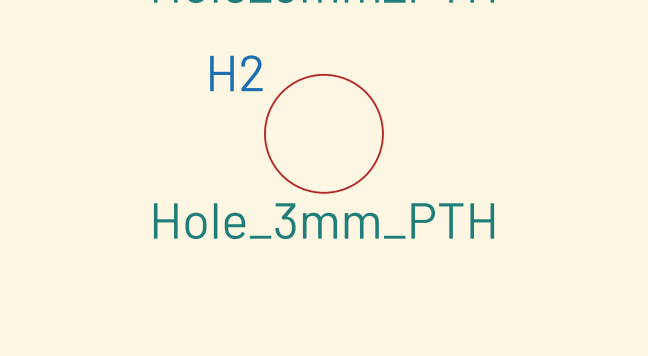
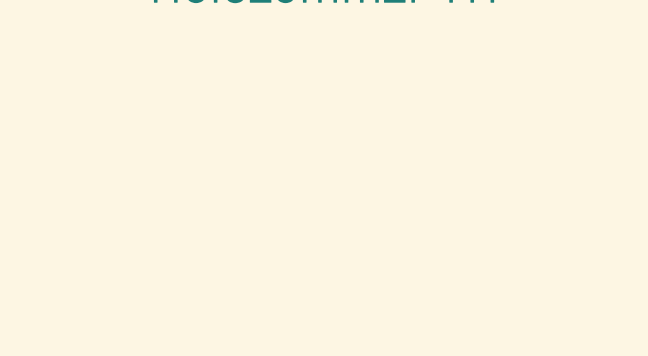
H2: Hole_3mm_PTH (323, 133) -> none

